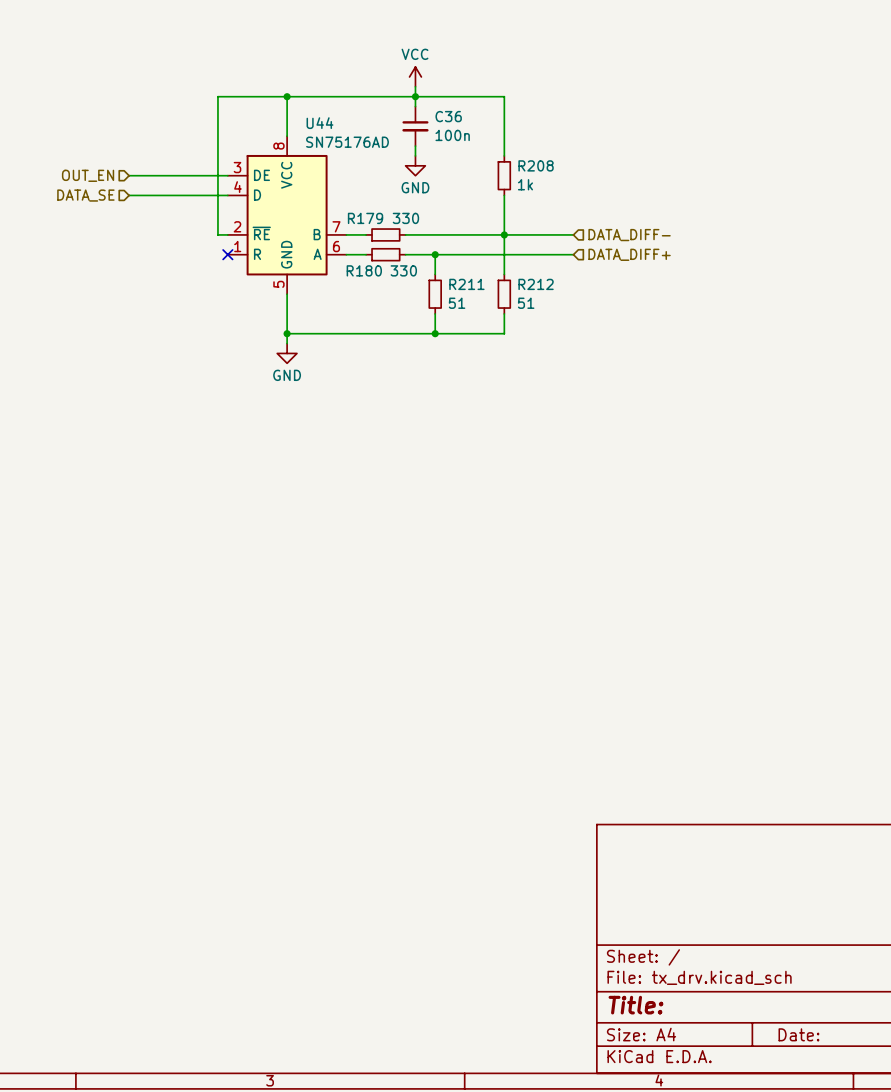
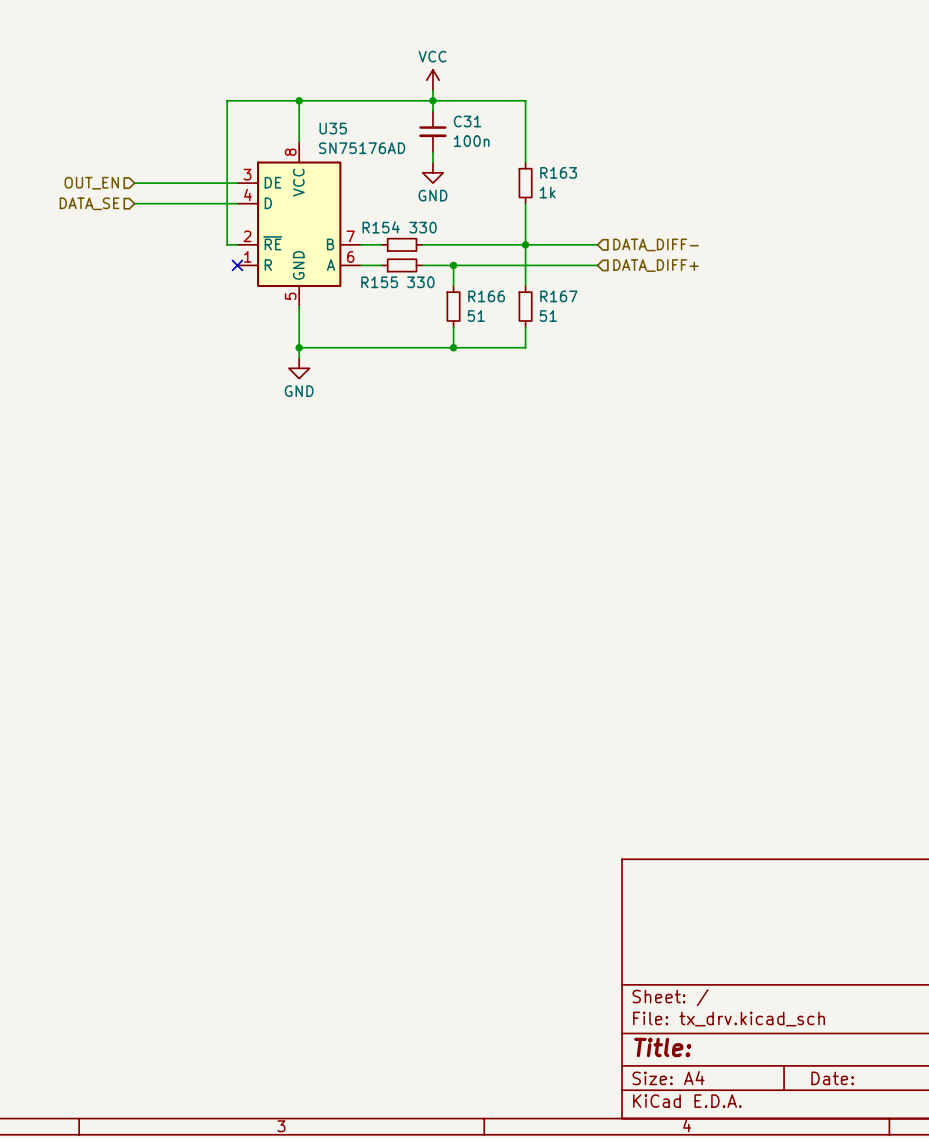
C36 name: C36 (448, 116) -> C31 (467, 121)
U44 name: U44 (319, 123) -> U35 (333, 128)
R208 name: R208 (536, 165) -> R163 (558, 172)
R179 name: R179 (365, 218) -> R154 (381, 227)
R180 name: R180 (364, 270) -> R155 (379, 282)
R211 name: R211 (466, 284) -> R166 (486, 296)
R212 name: R212 (536, 284) -> R167 (558, 296)

